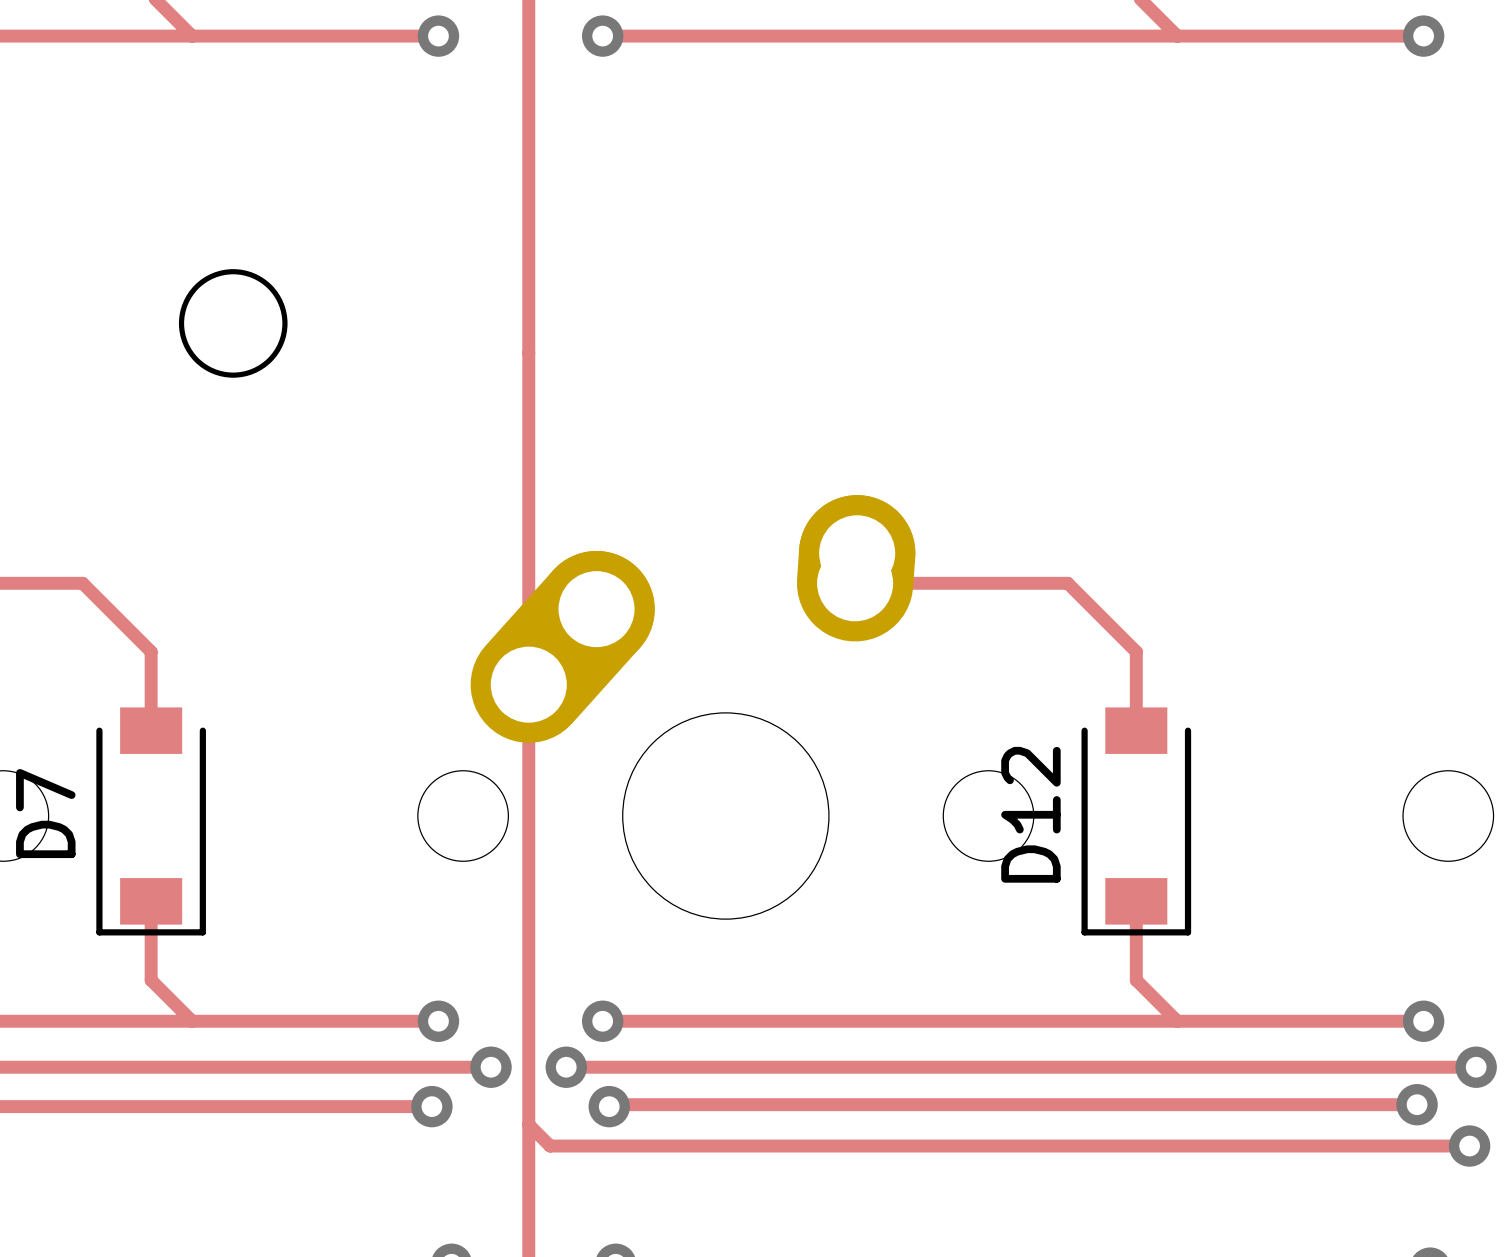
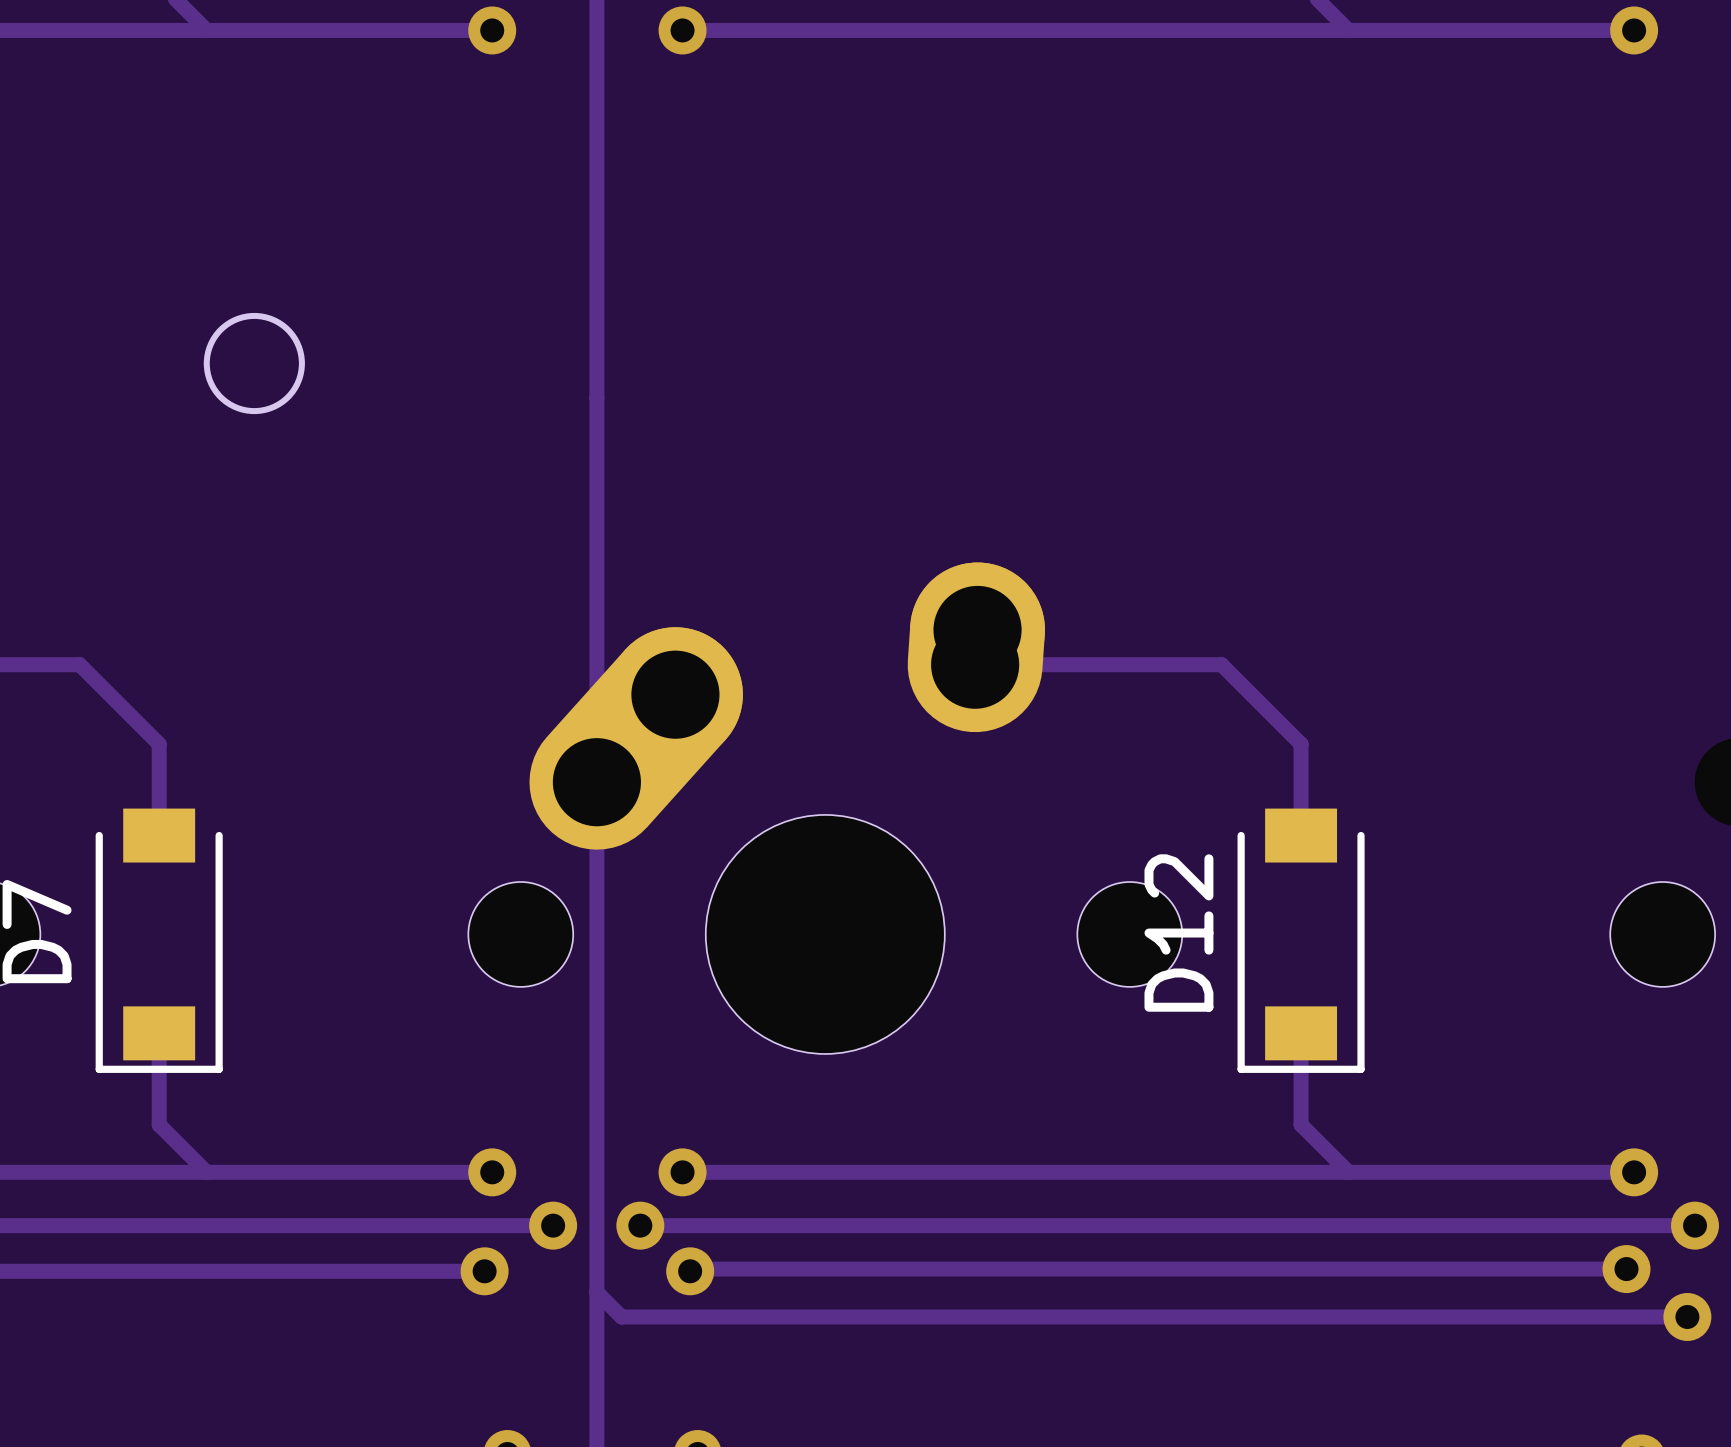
round board edge size: [178, 269, 288, 378] -> [203, 312, 305, 415]

